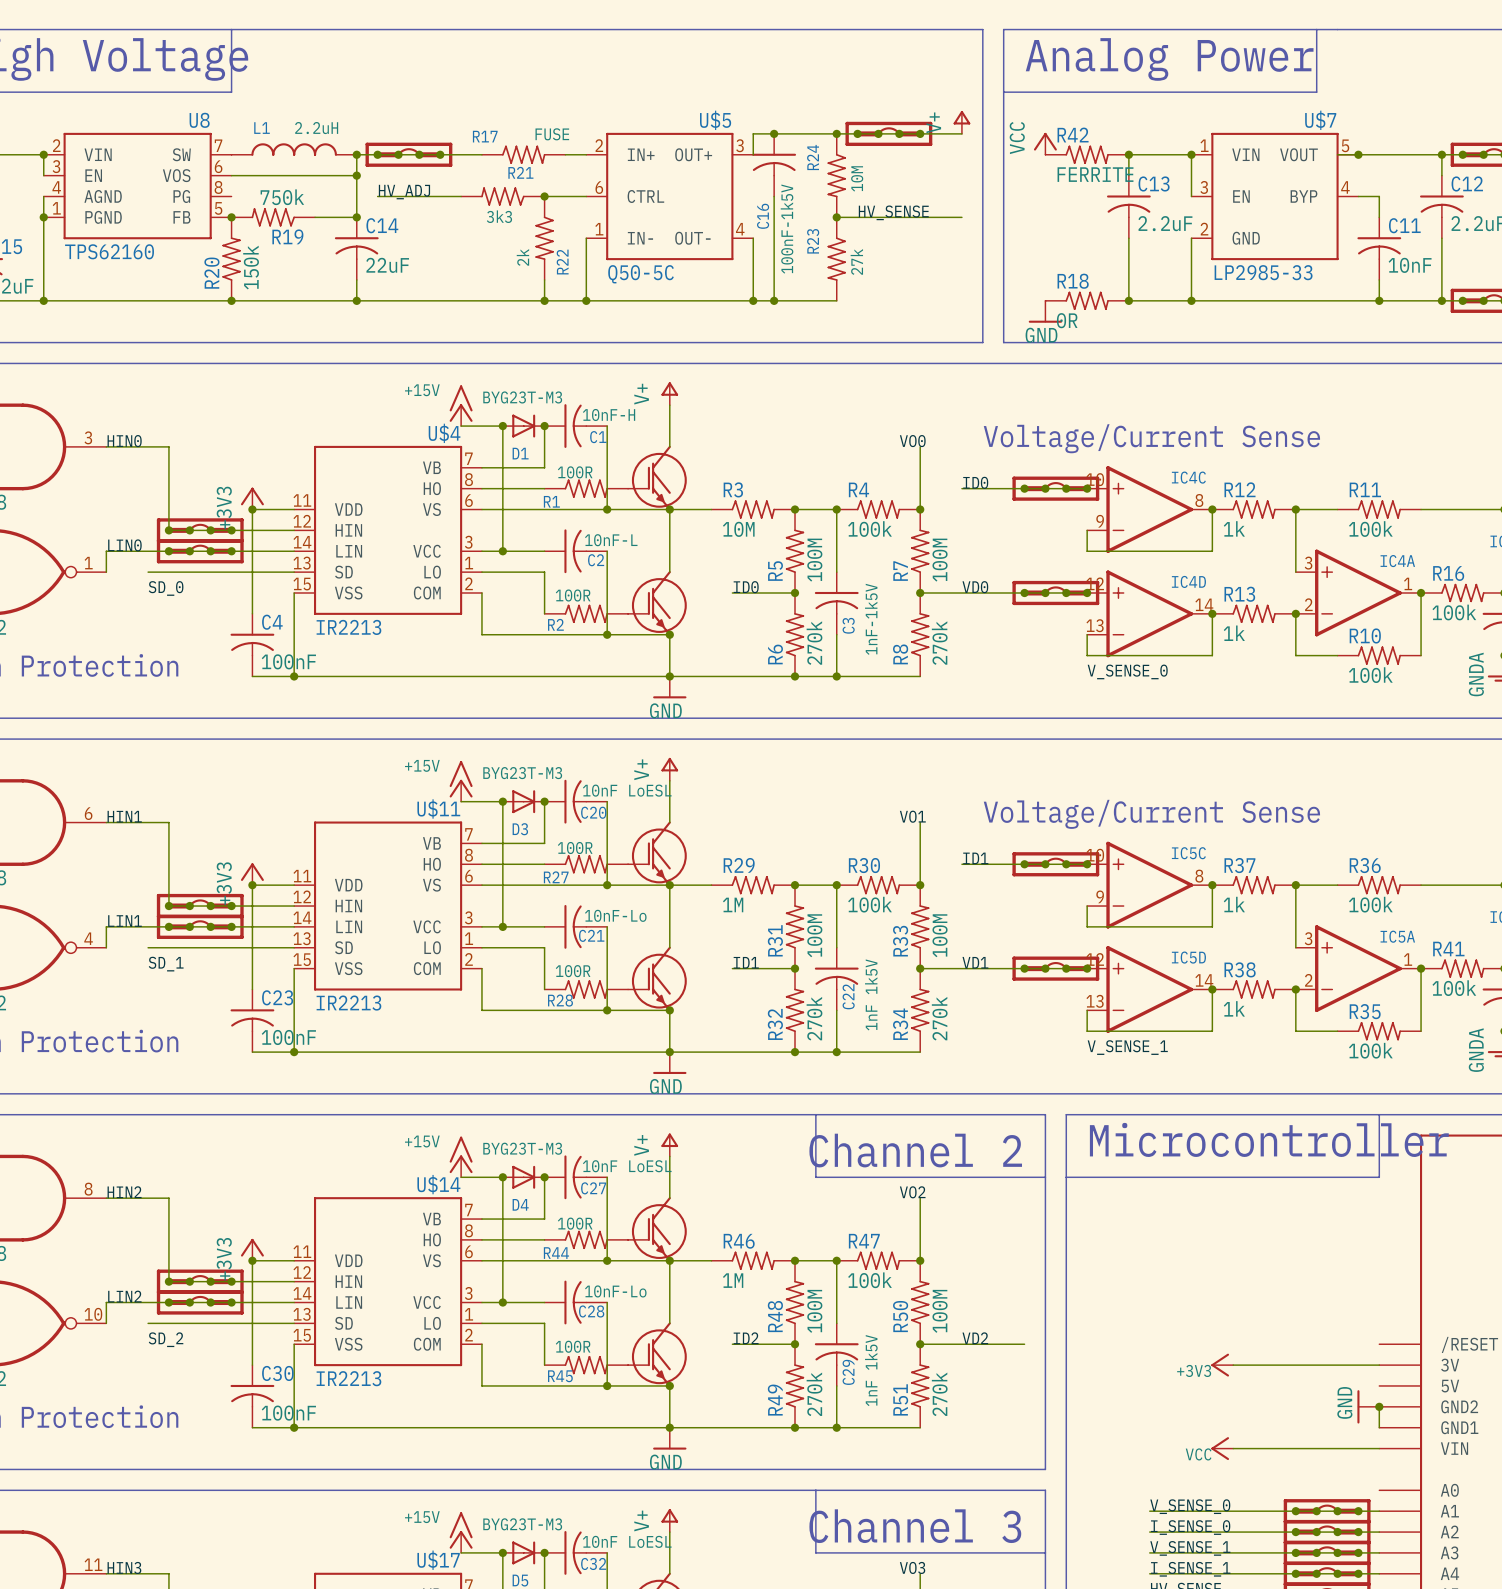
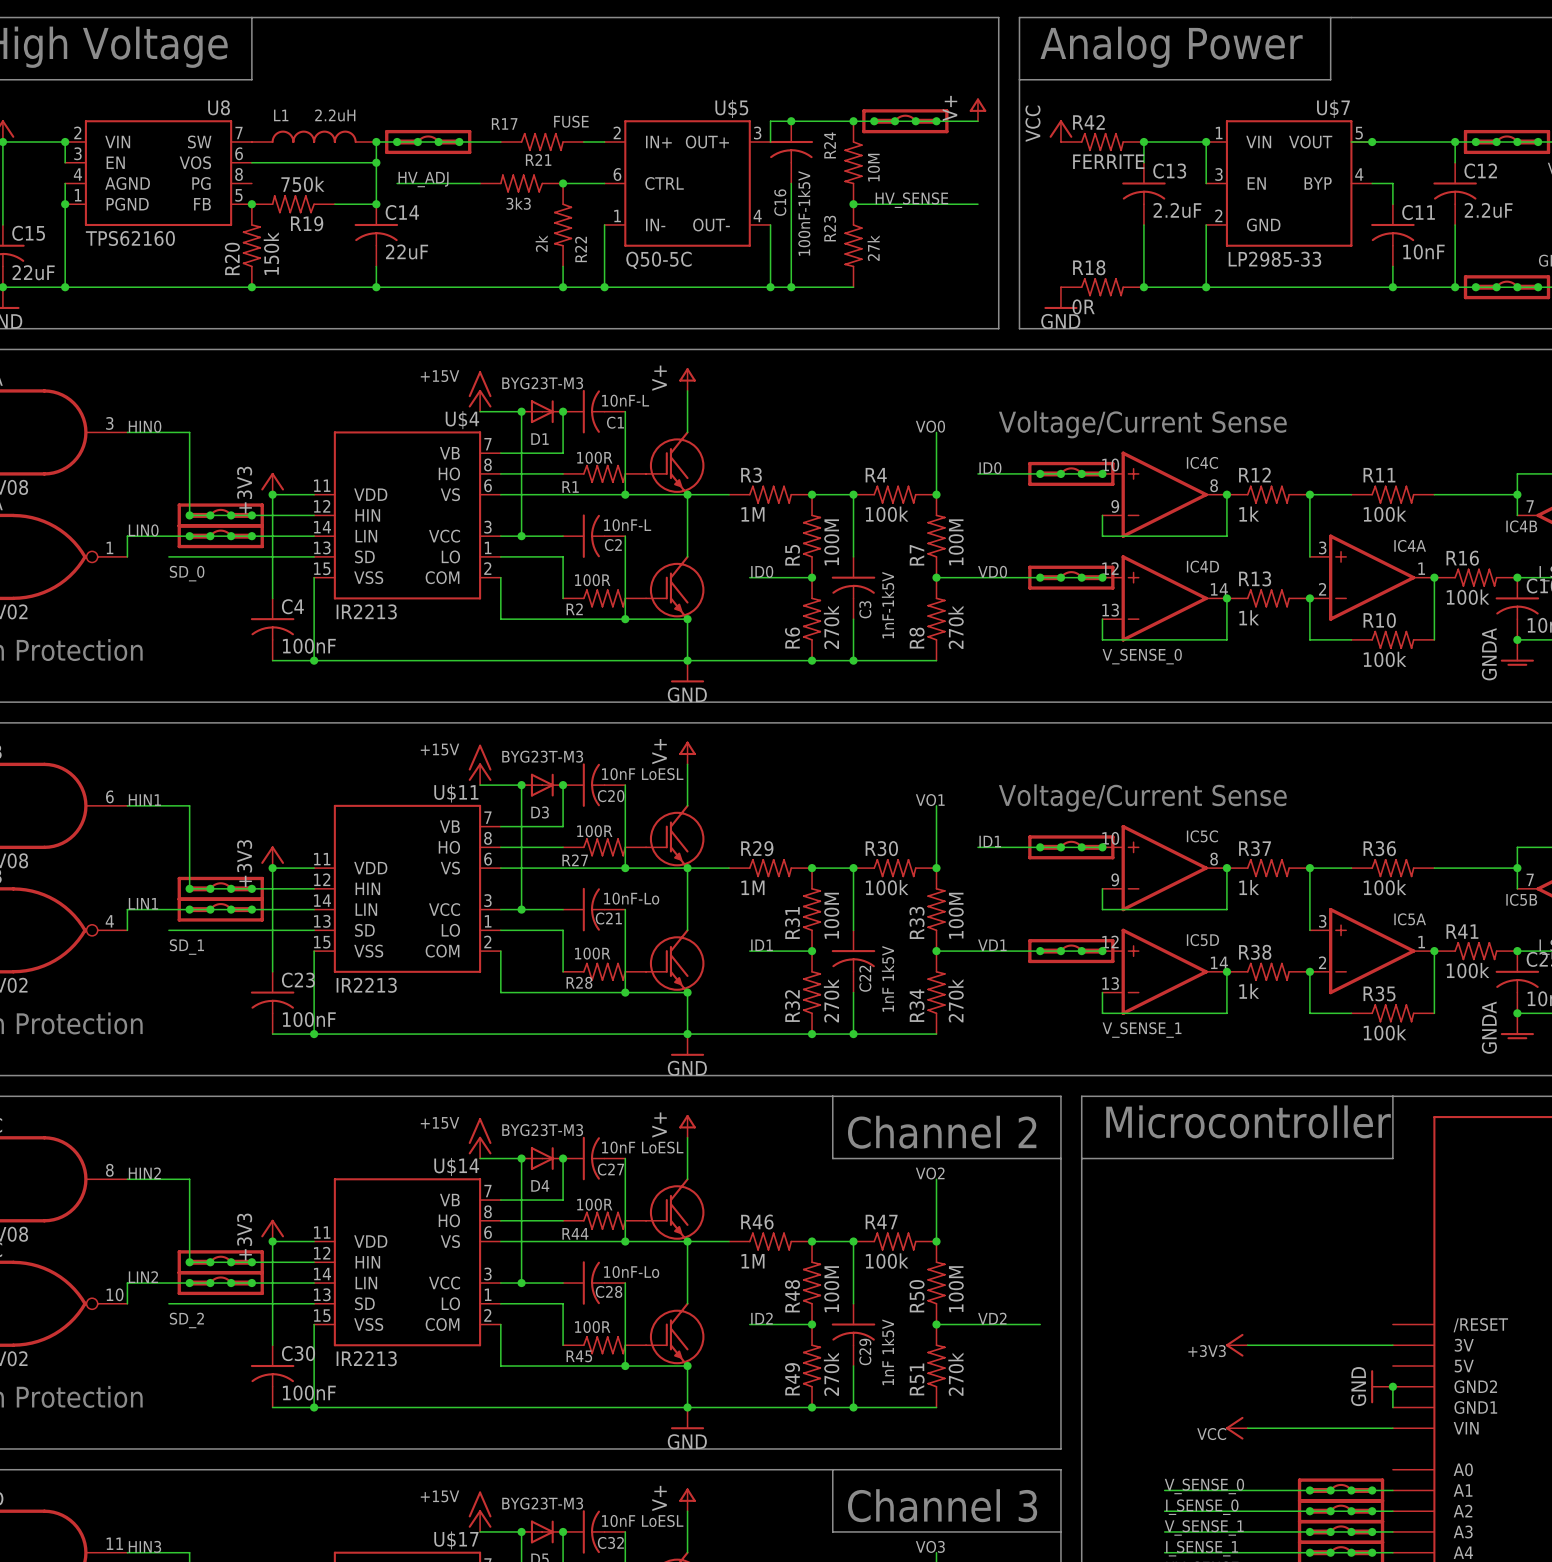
C1 value: 10nF-H (609, 414) -> 10nF-L (625, 400)
R3 value: 10M (738, 529) -> 1M (752, 514)

